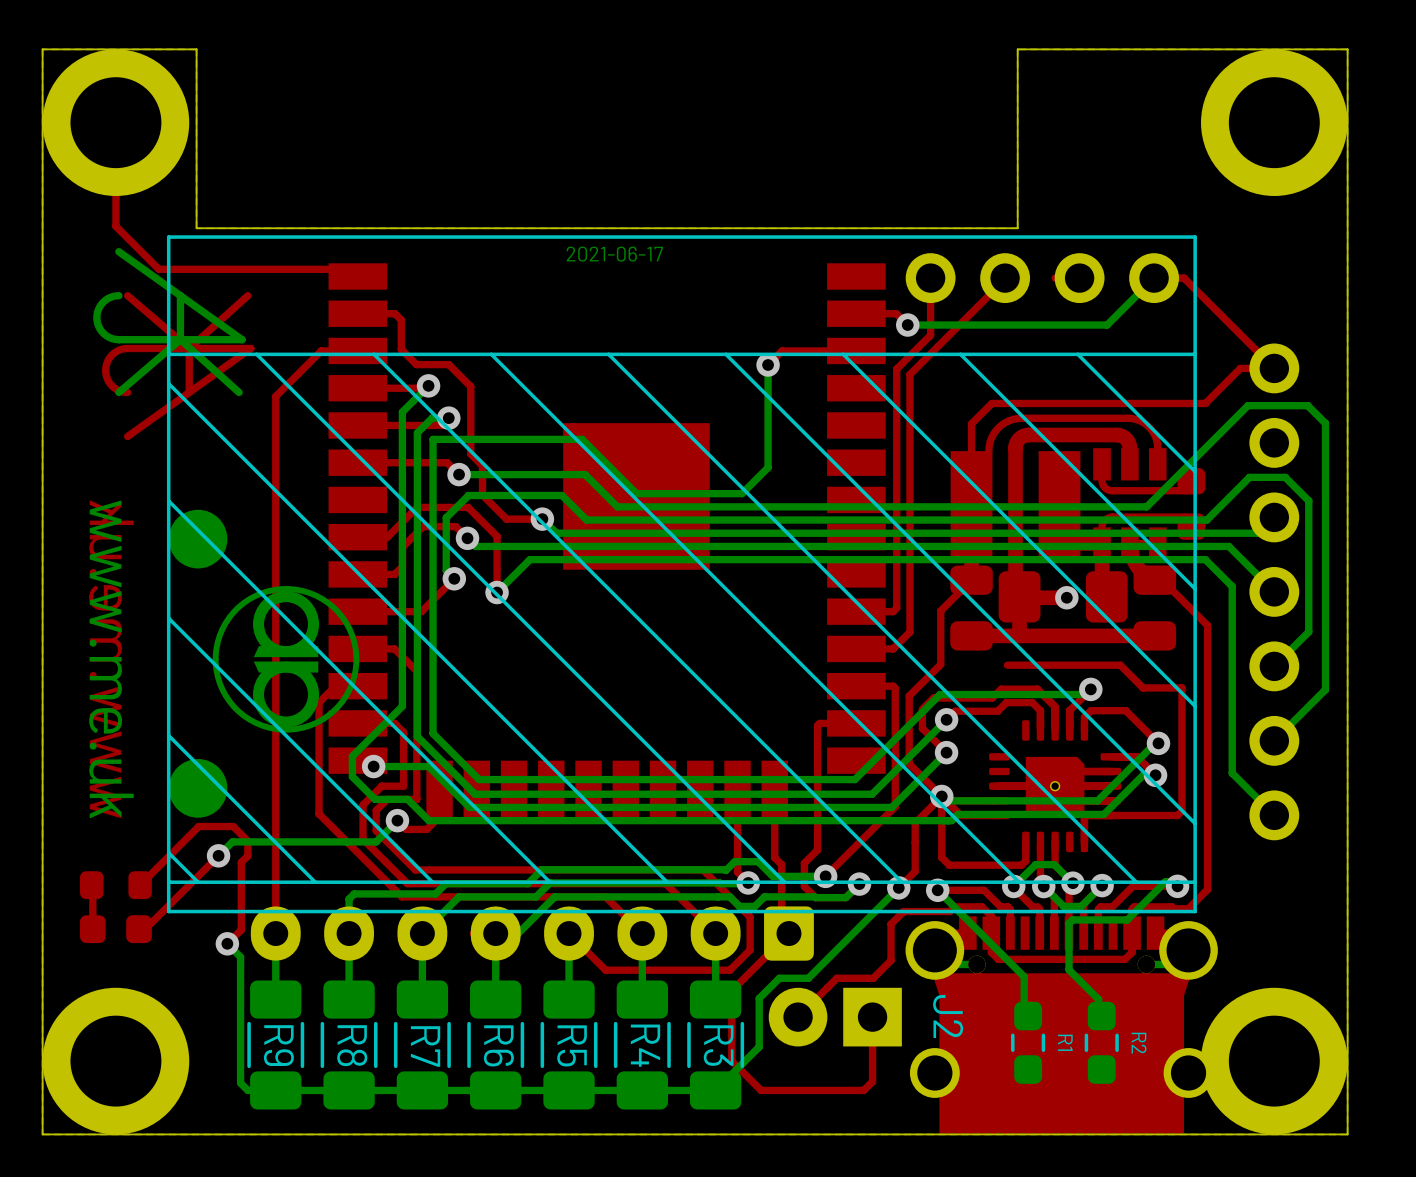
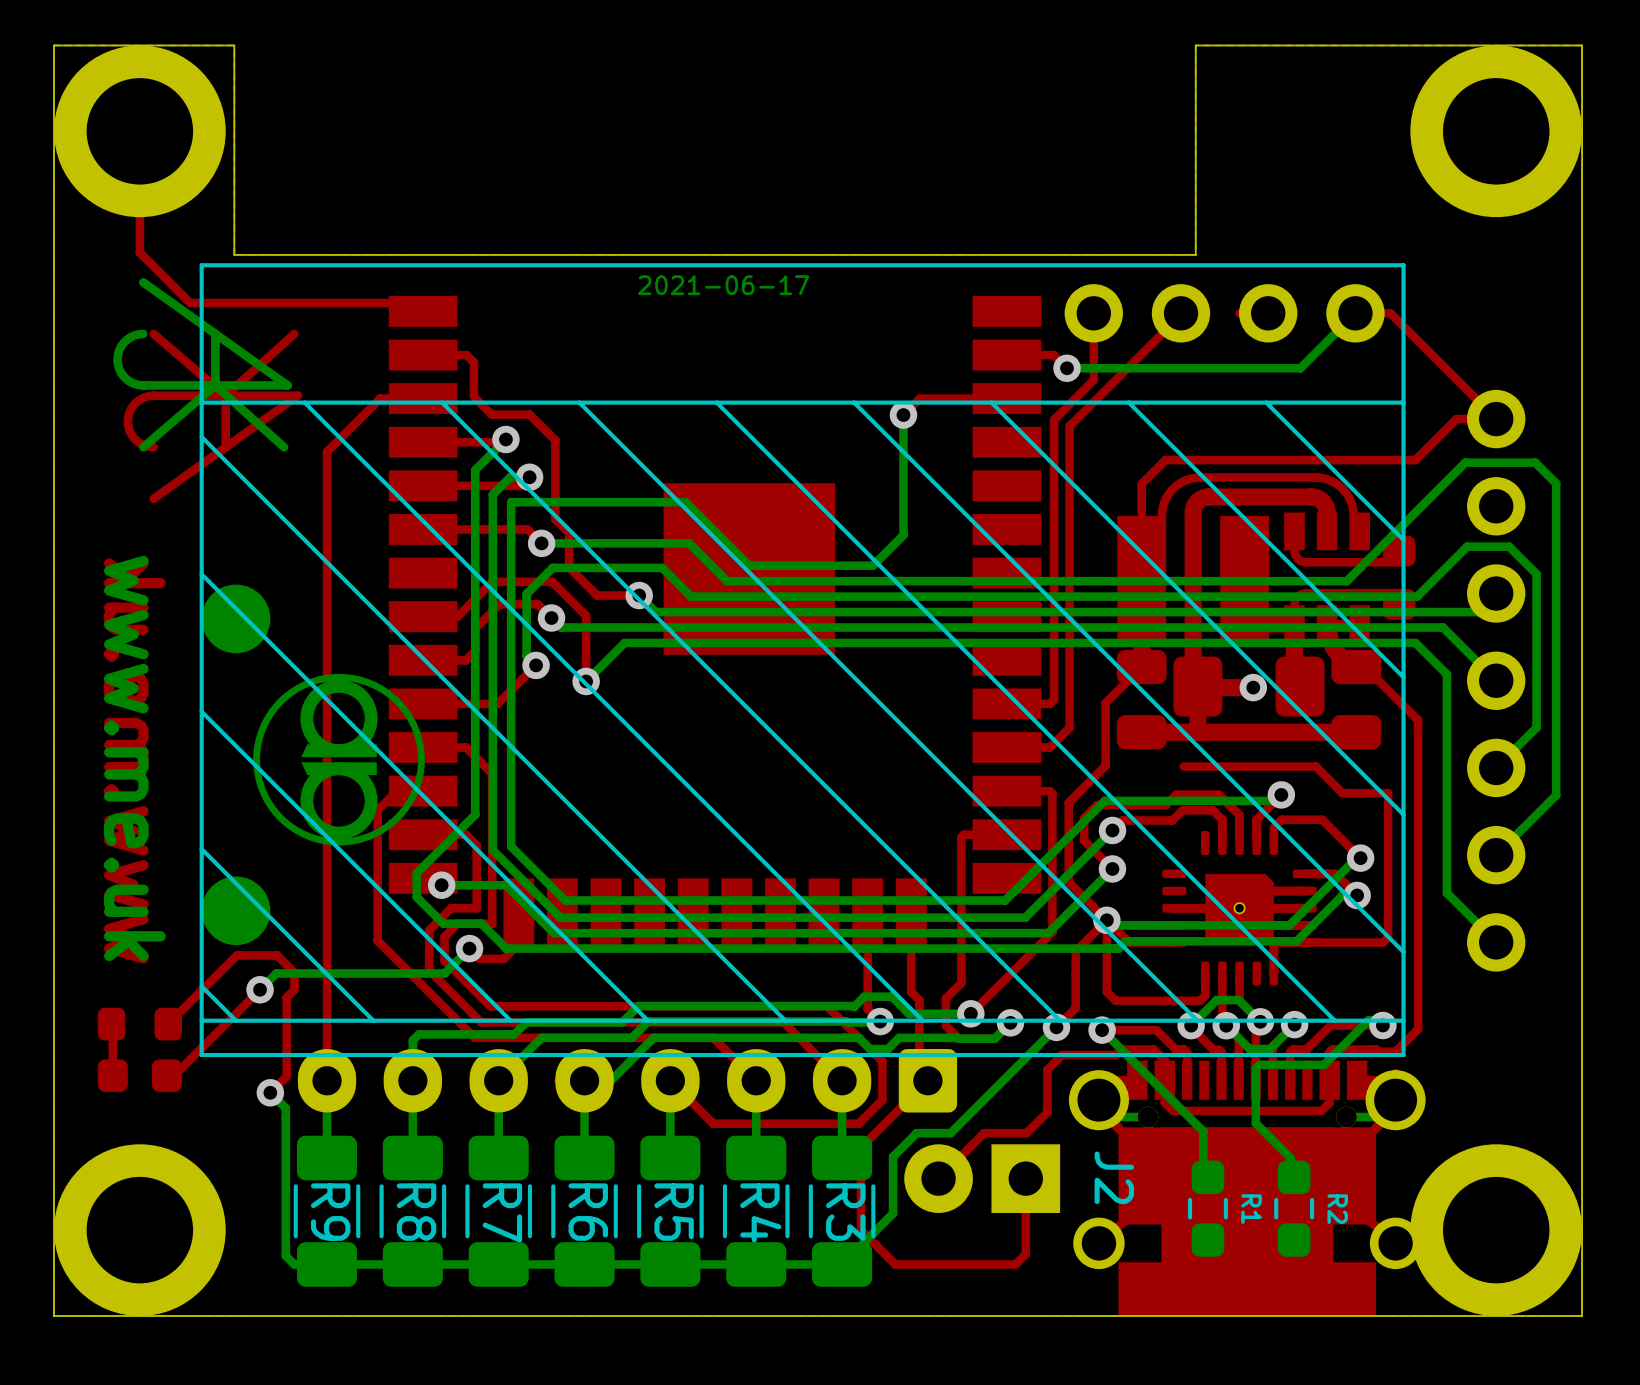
part footprint: [950, 414, 1206, 651] -> [1116, 473, 1416, 750]
part footprint: [905, 916, 1218, 1135] -> [1068, 1060, 1426, 1316]

